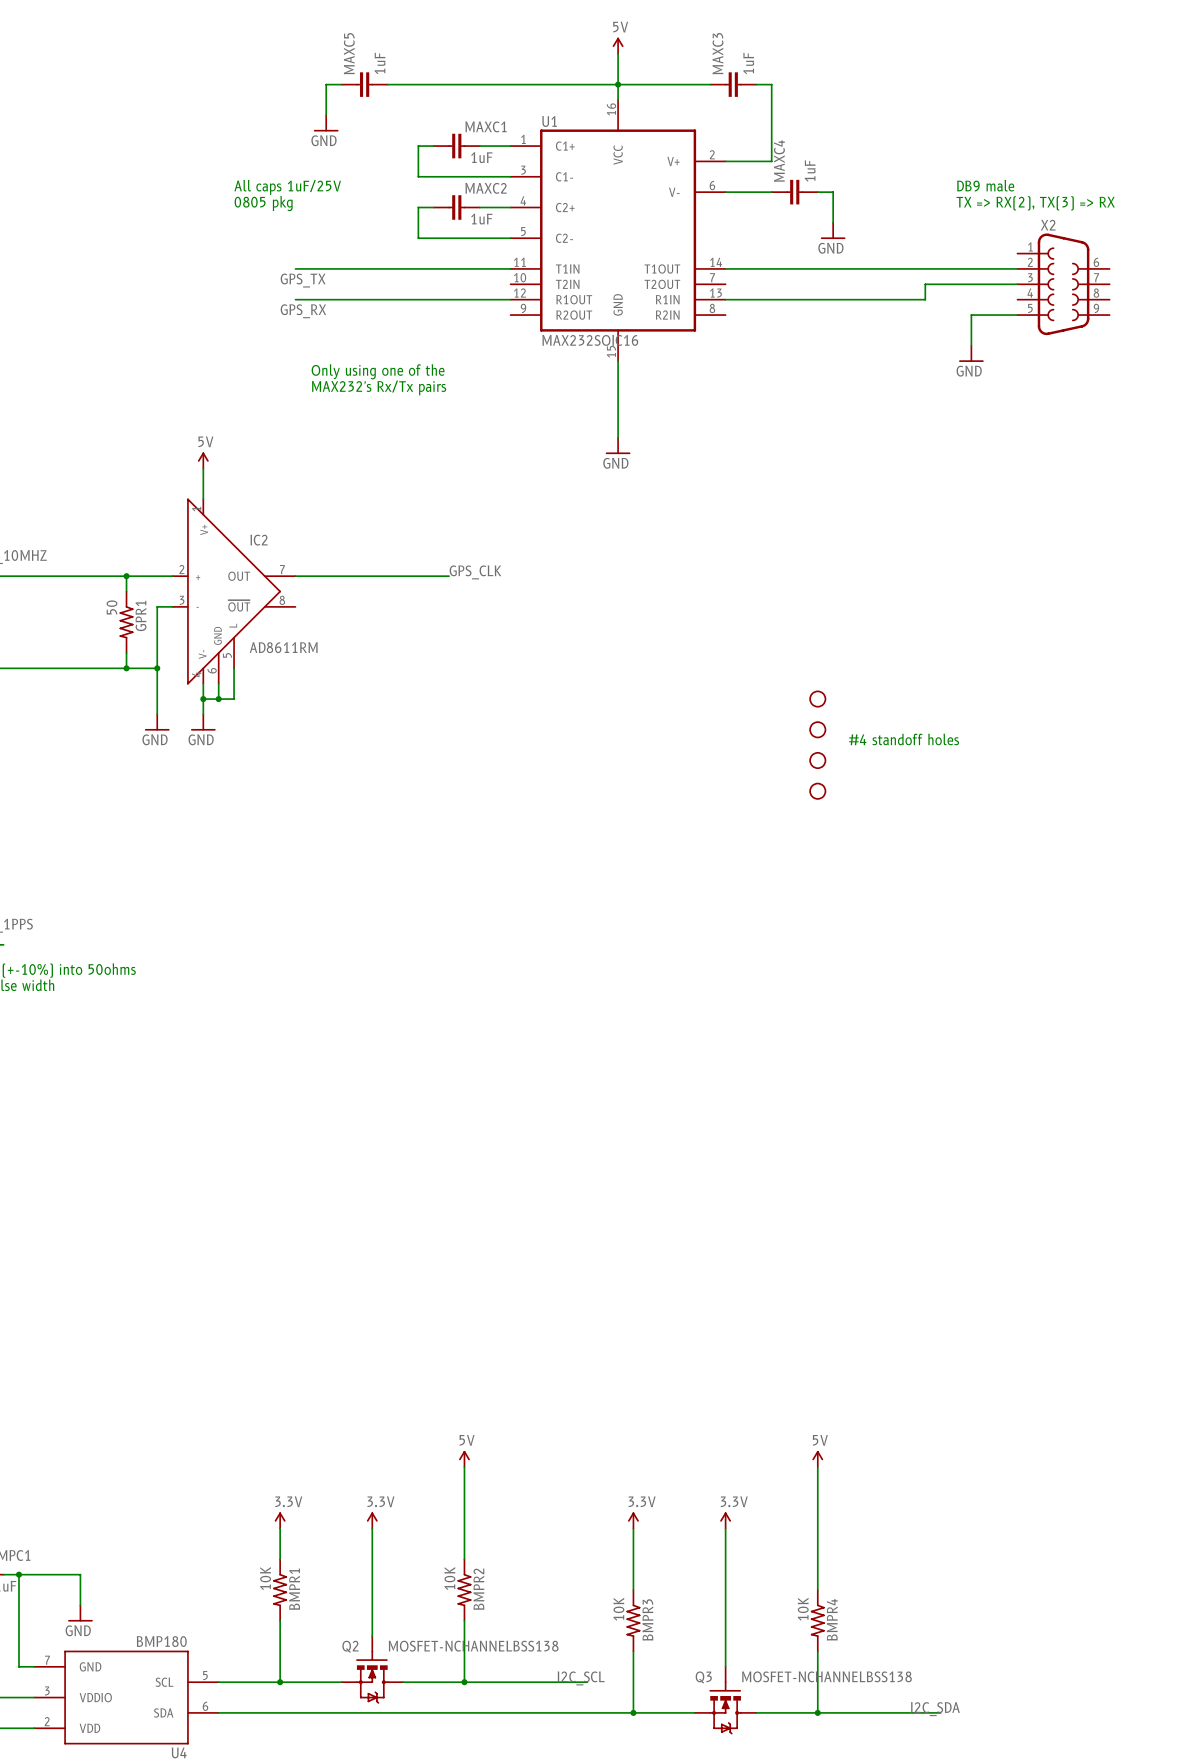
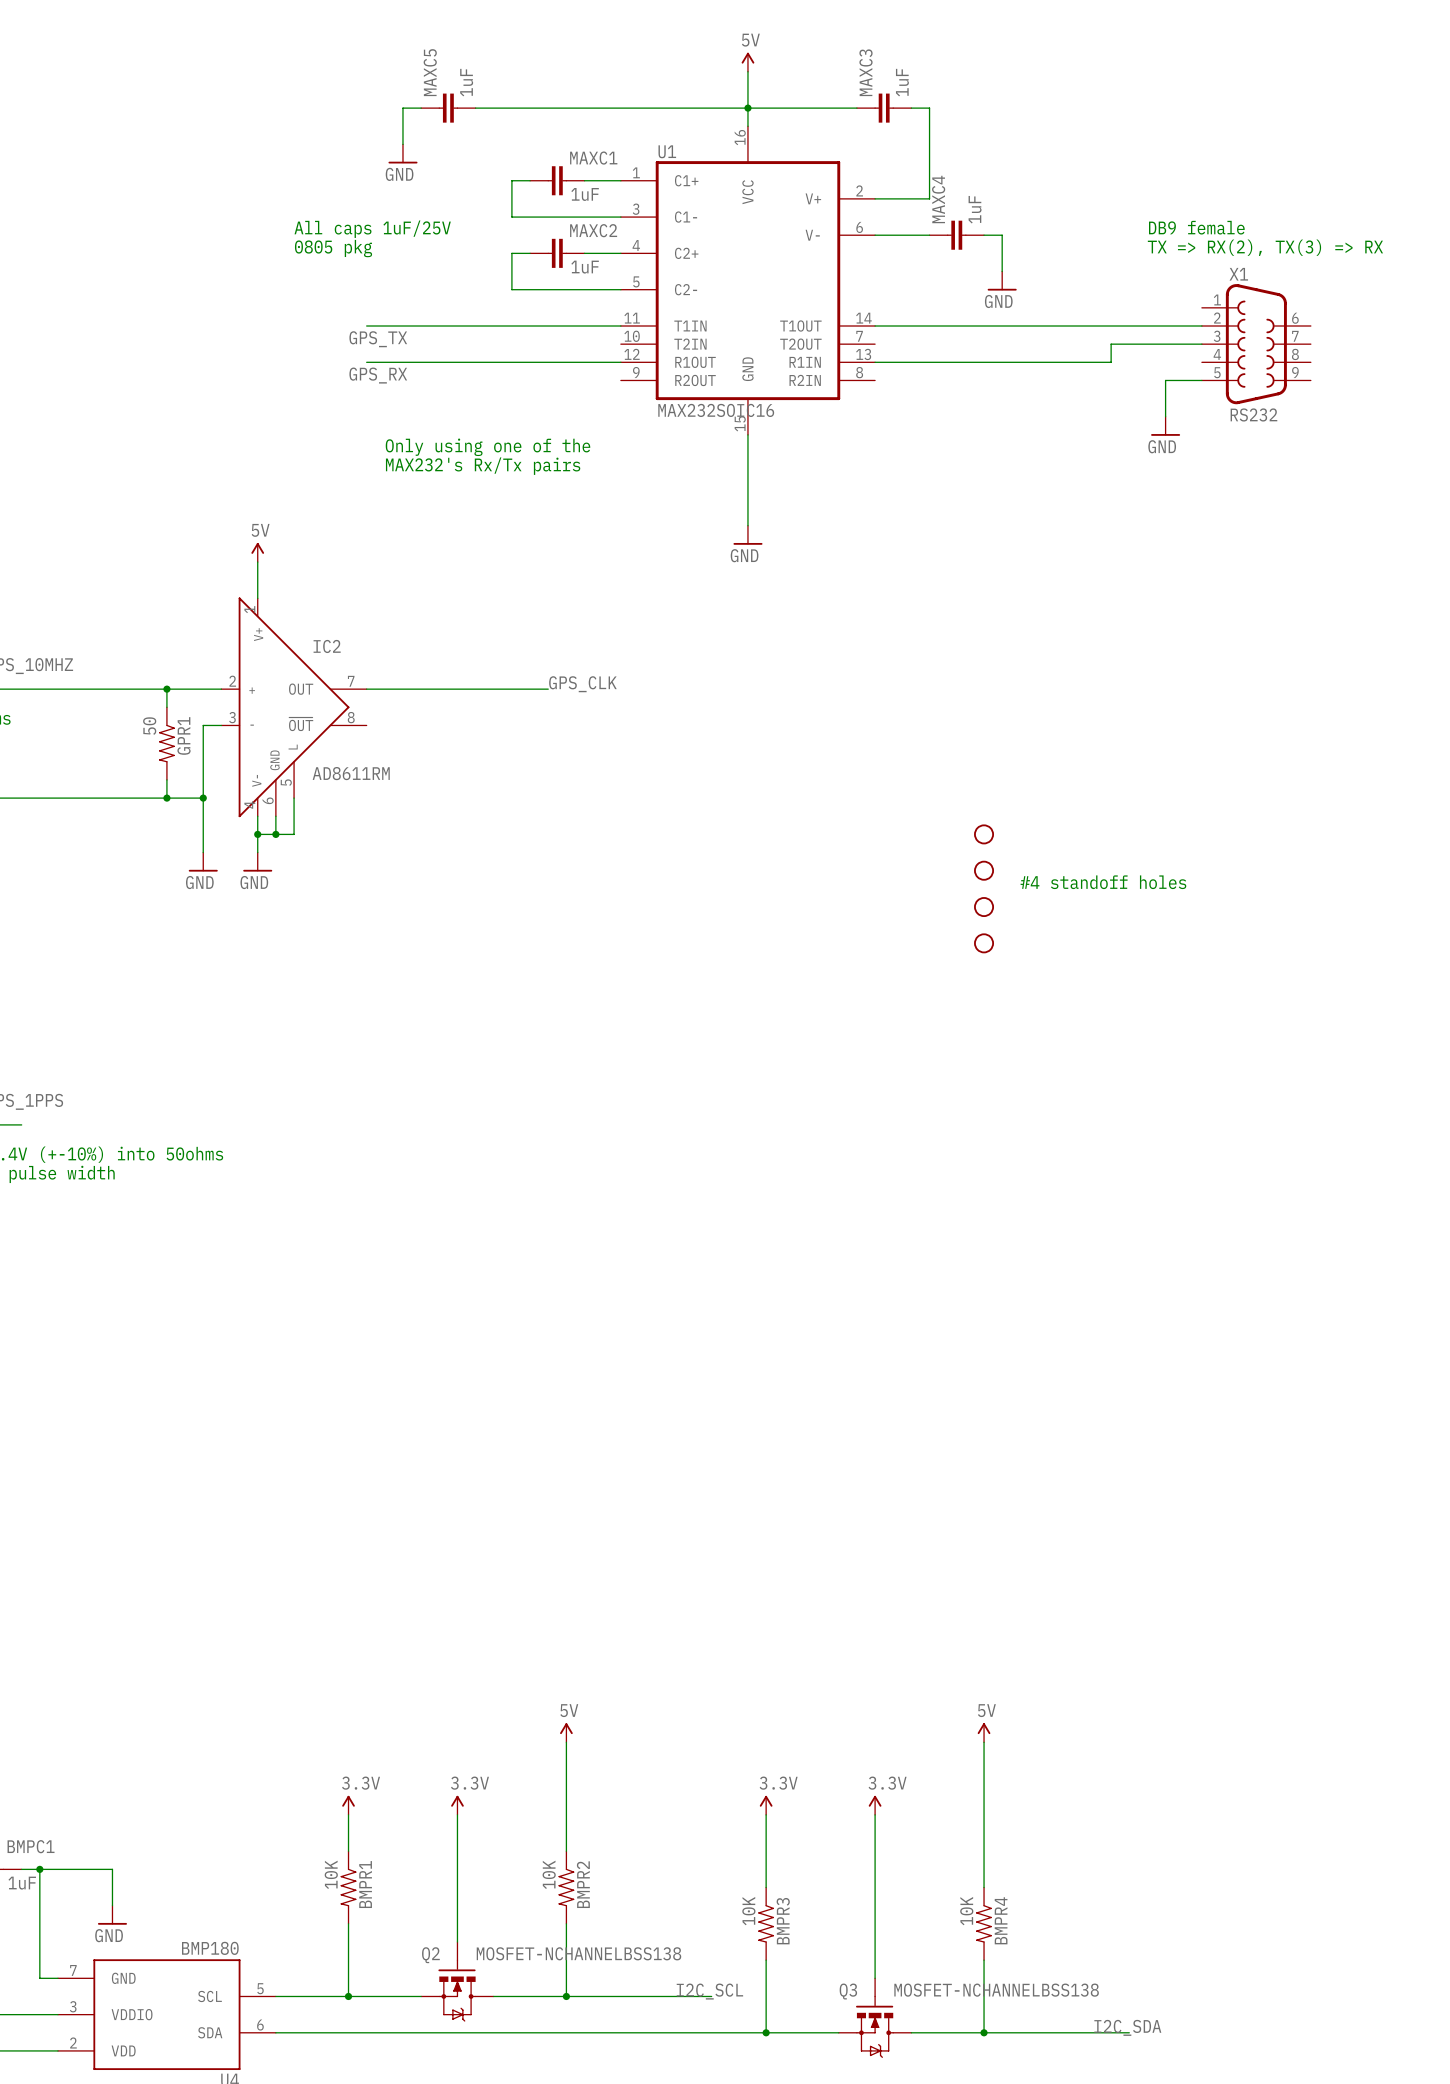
text: DB9 male (985, 185) -> DB9 female (1196, 227)
X1: none -> RS232 (1256, 344)
X2: (1063, 284) -> none

